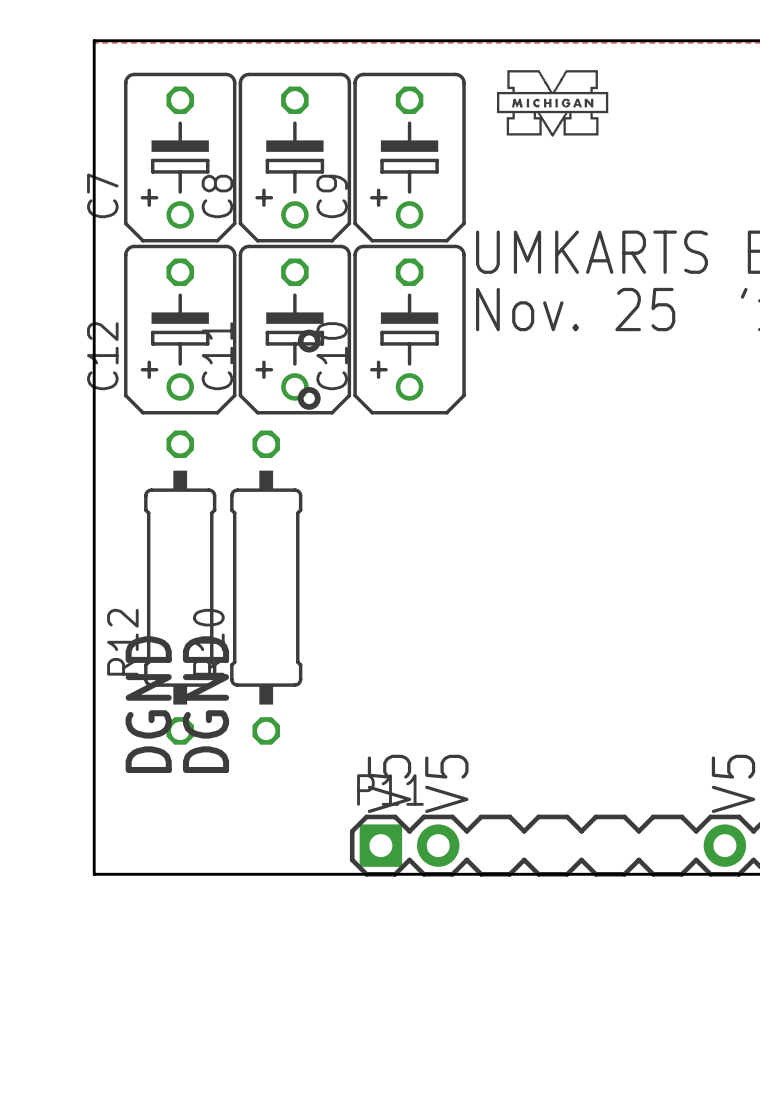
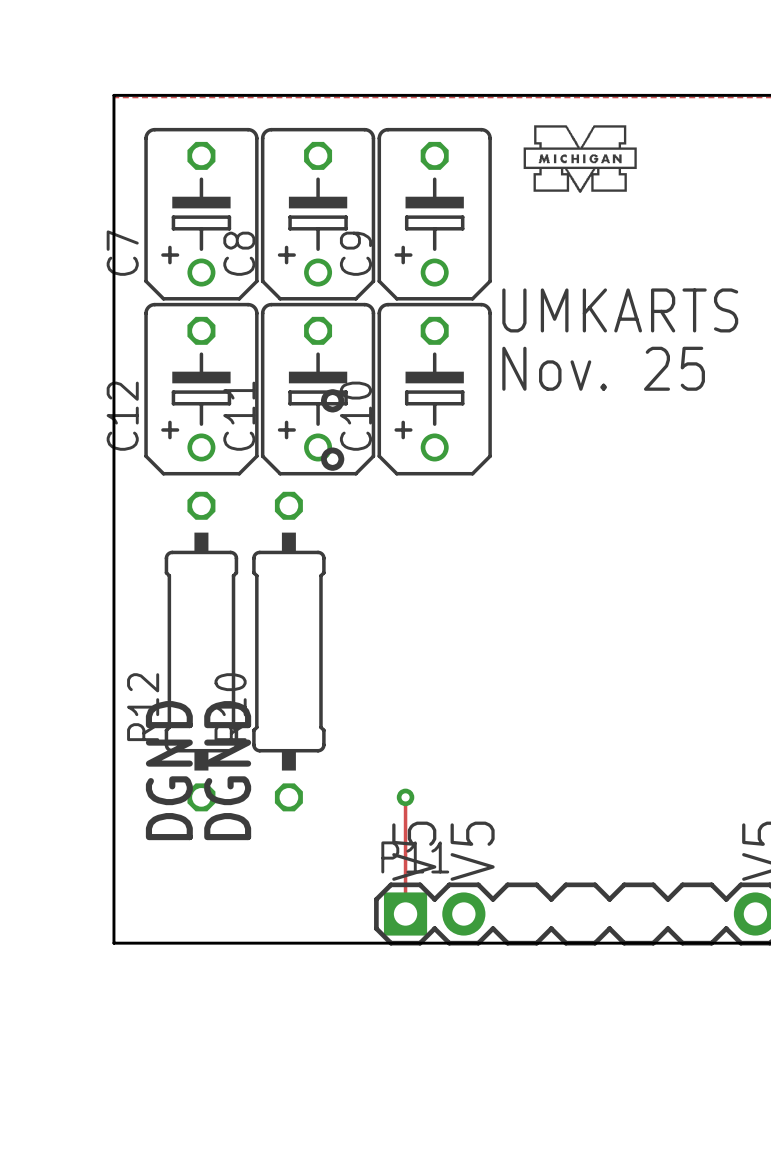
track: none -> (405, 797) (405, 914)
via: none -> (405, 797)

